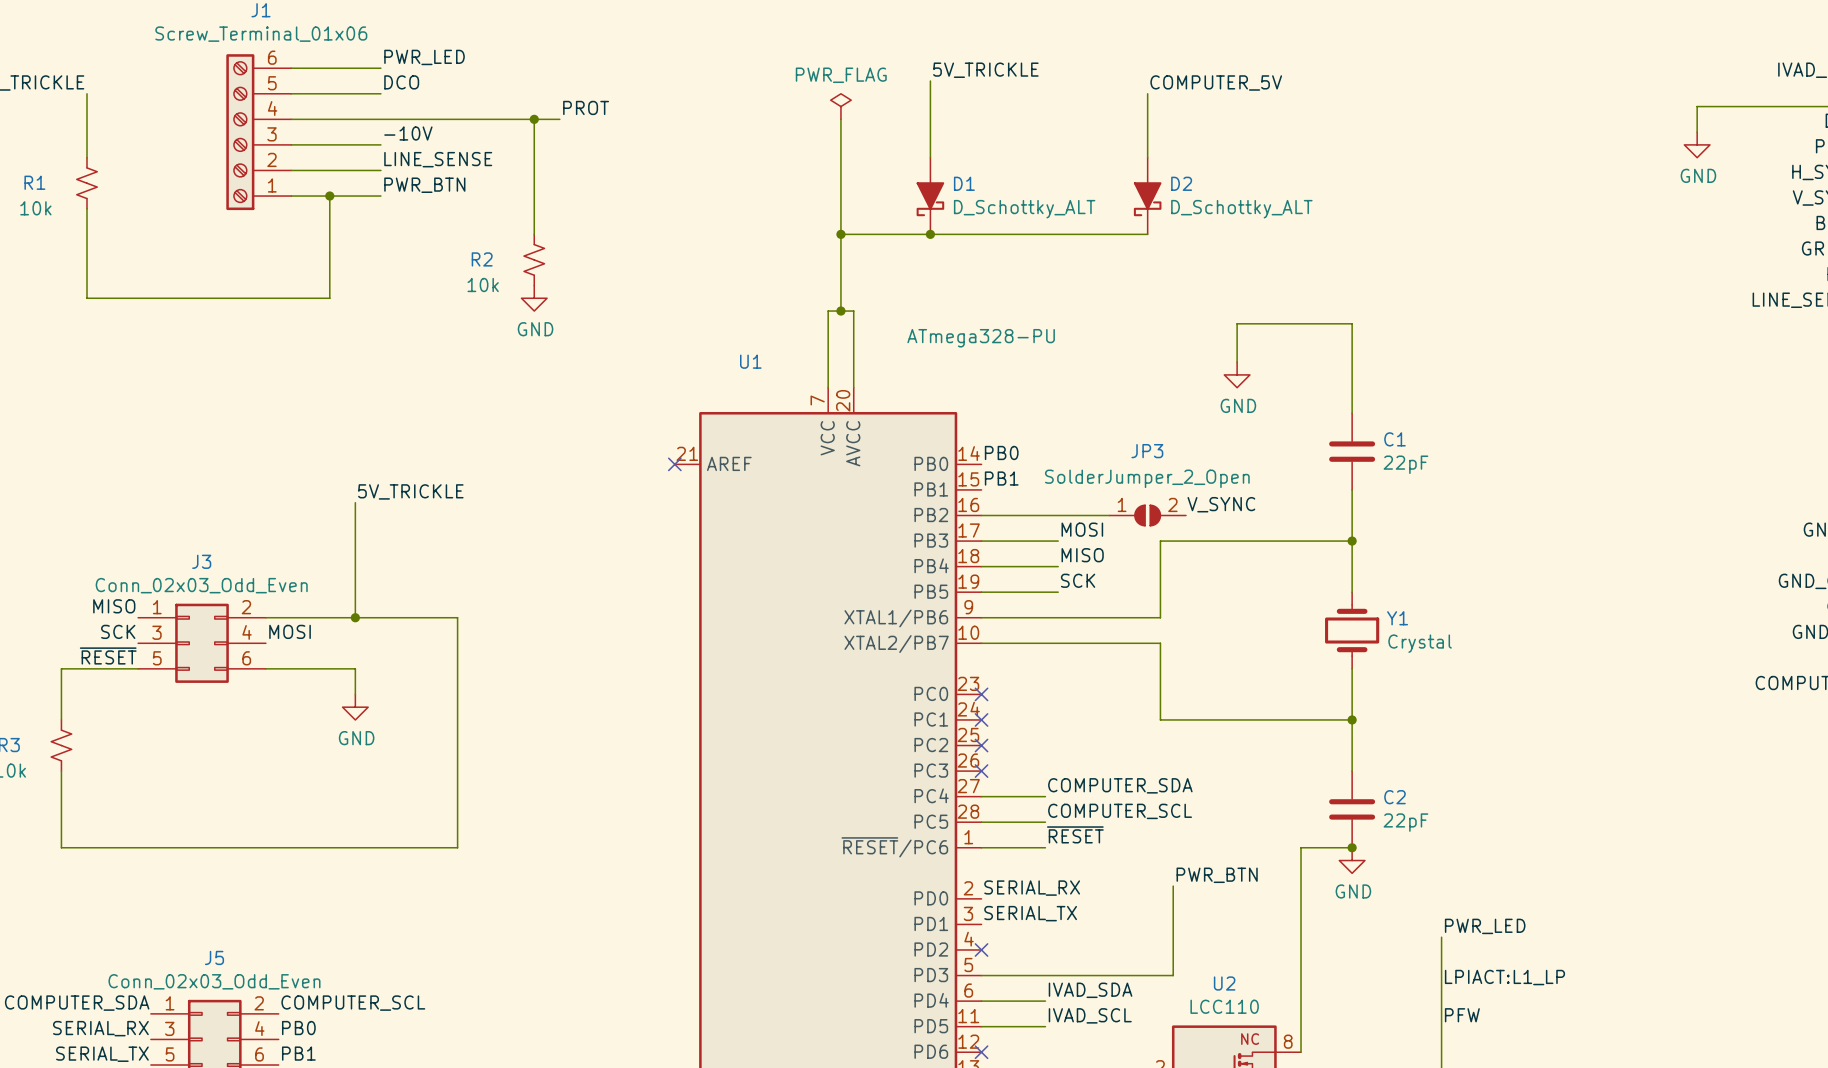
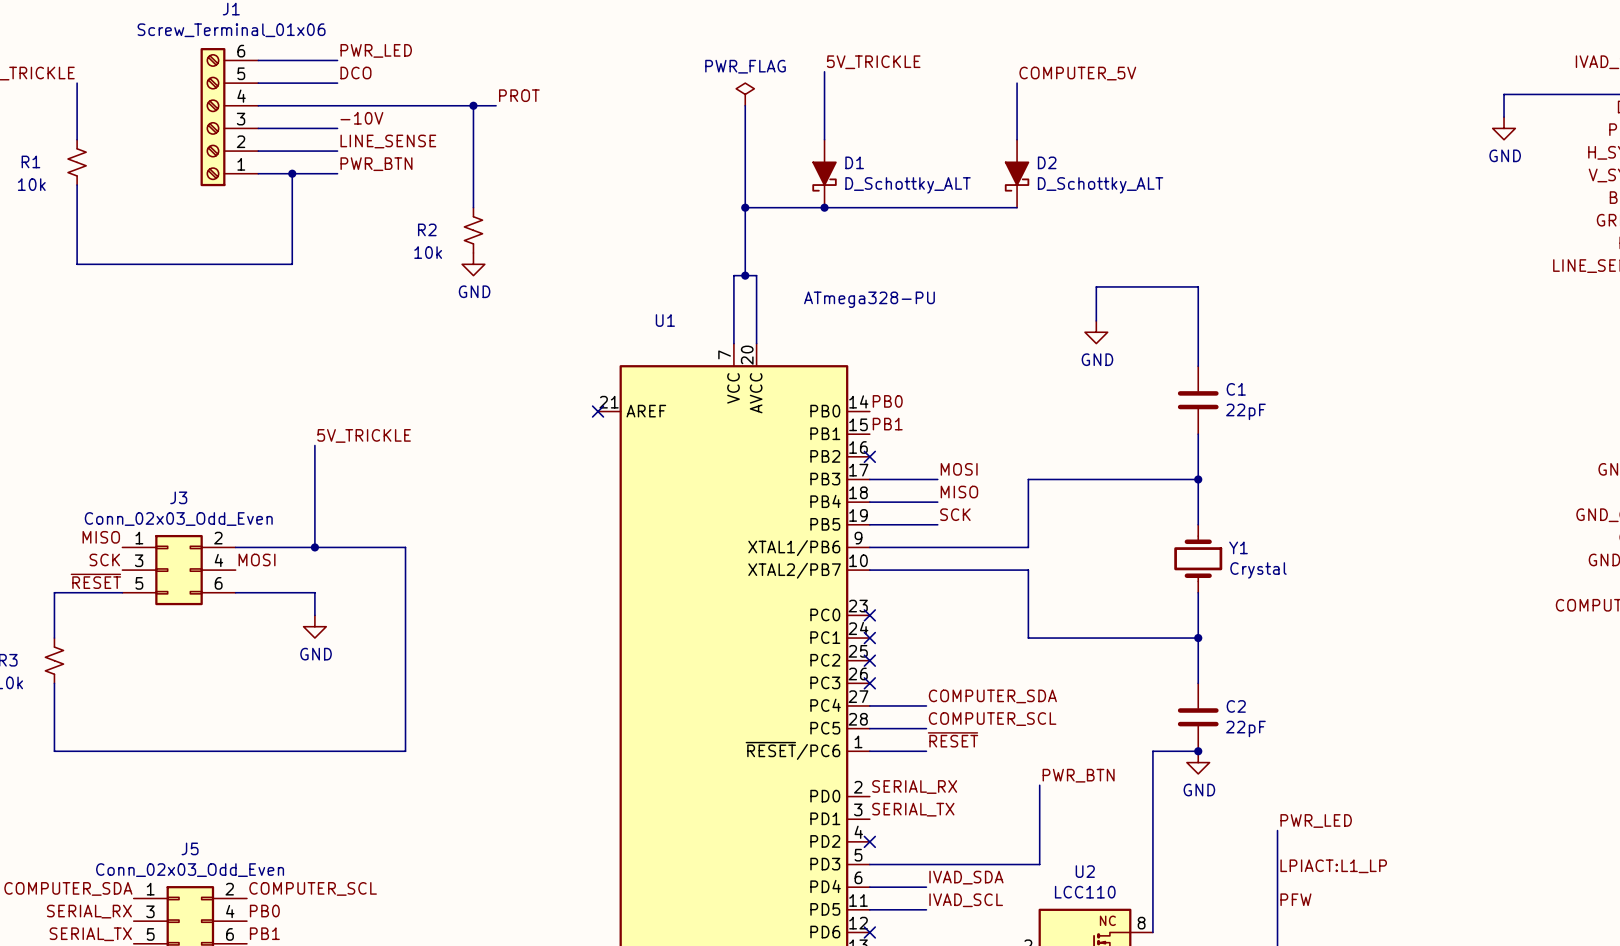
label: V_SYNC (1221, 504) -> none
wire: (981, 515) (1109, 515) -> none
no-connect mark: none -> (869, 456)
JP3: SolderJumper_2_Open (1147, 515) -> none

